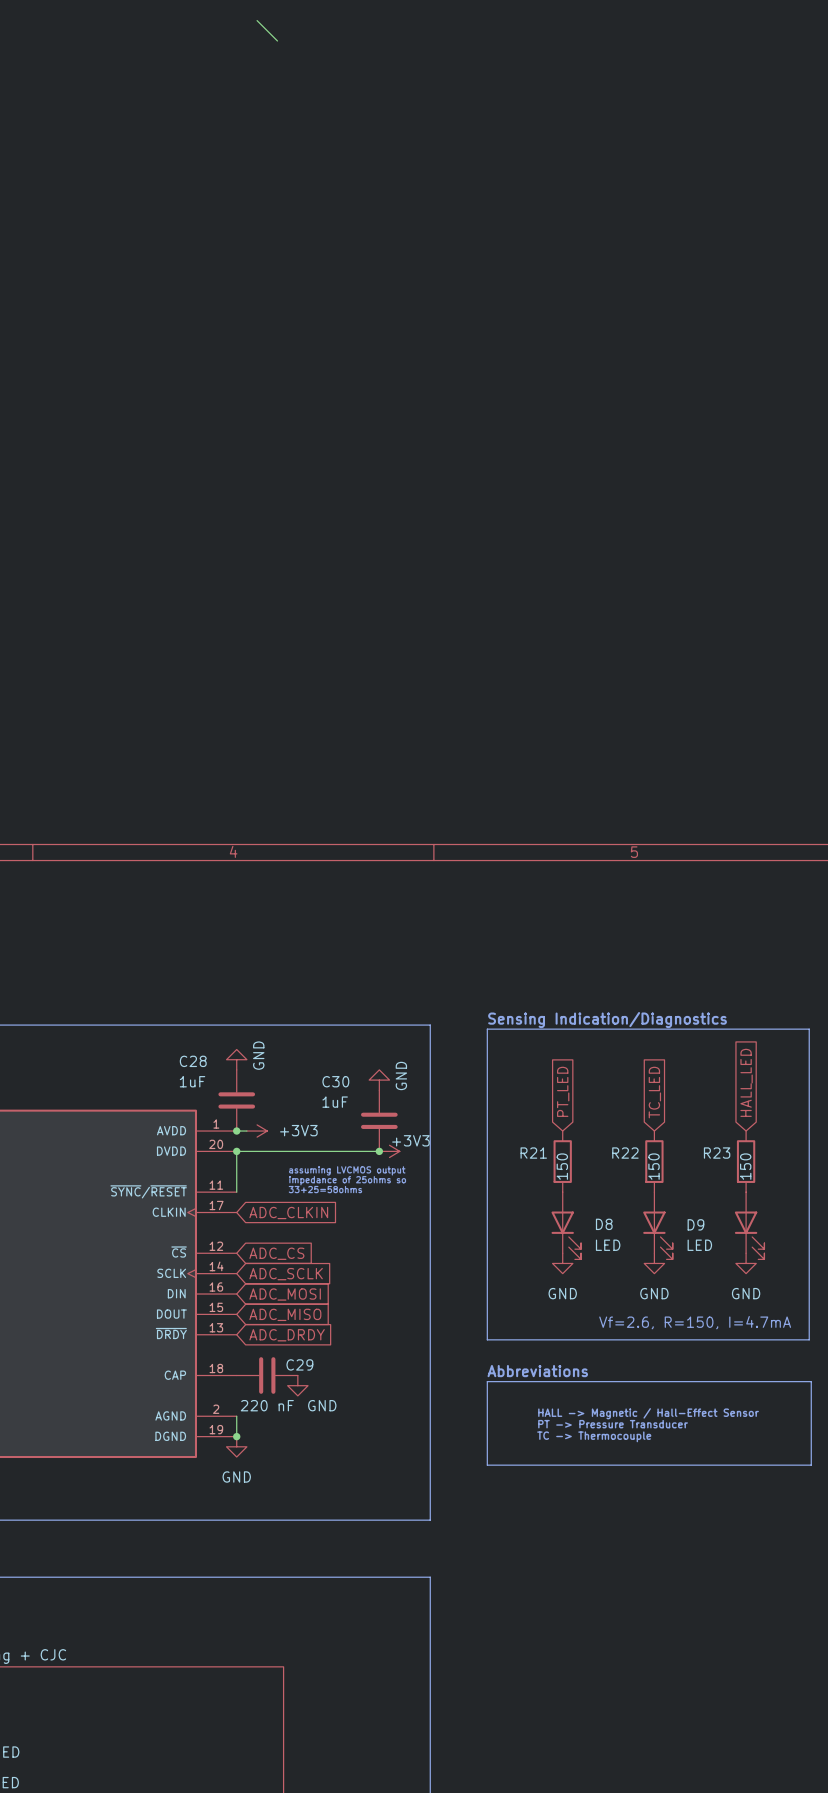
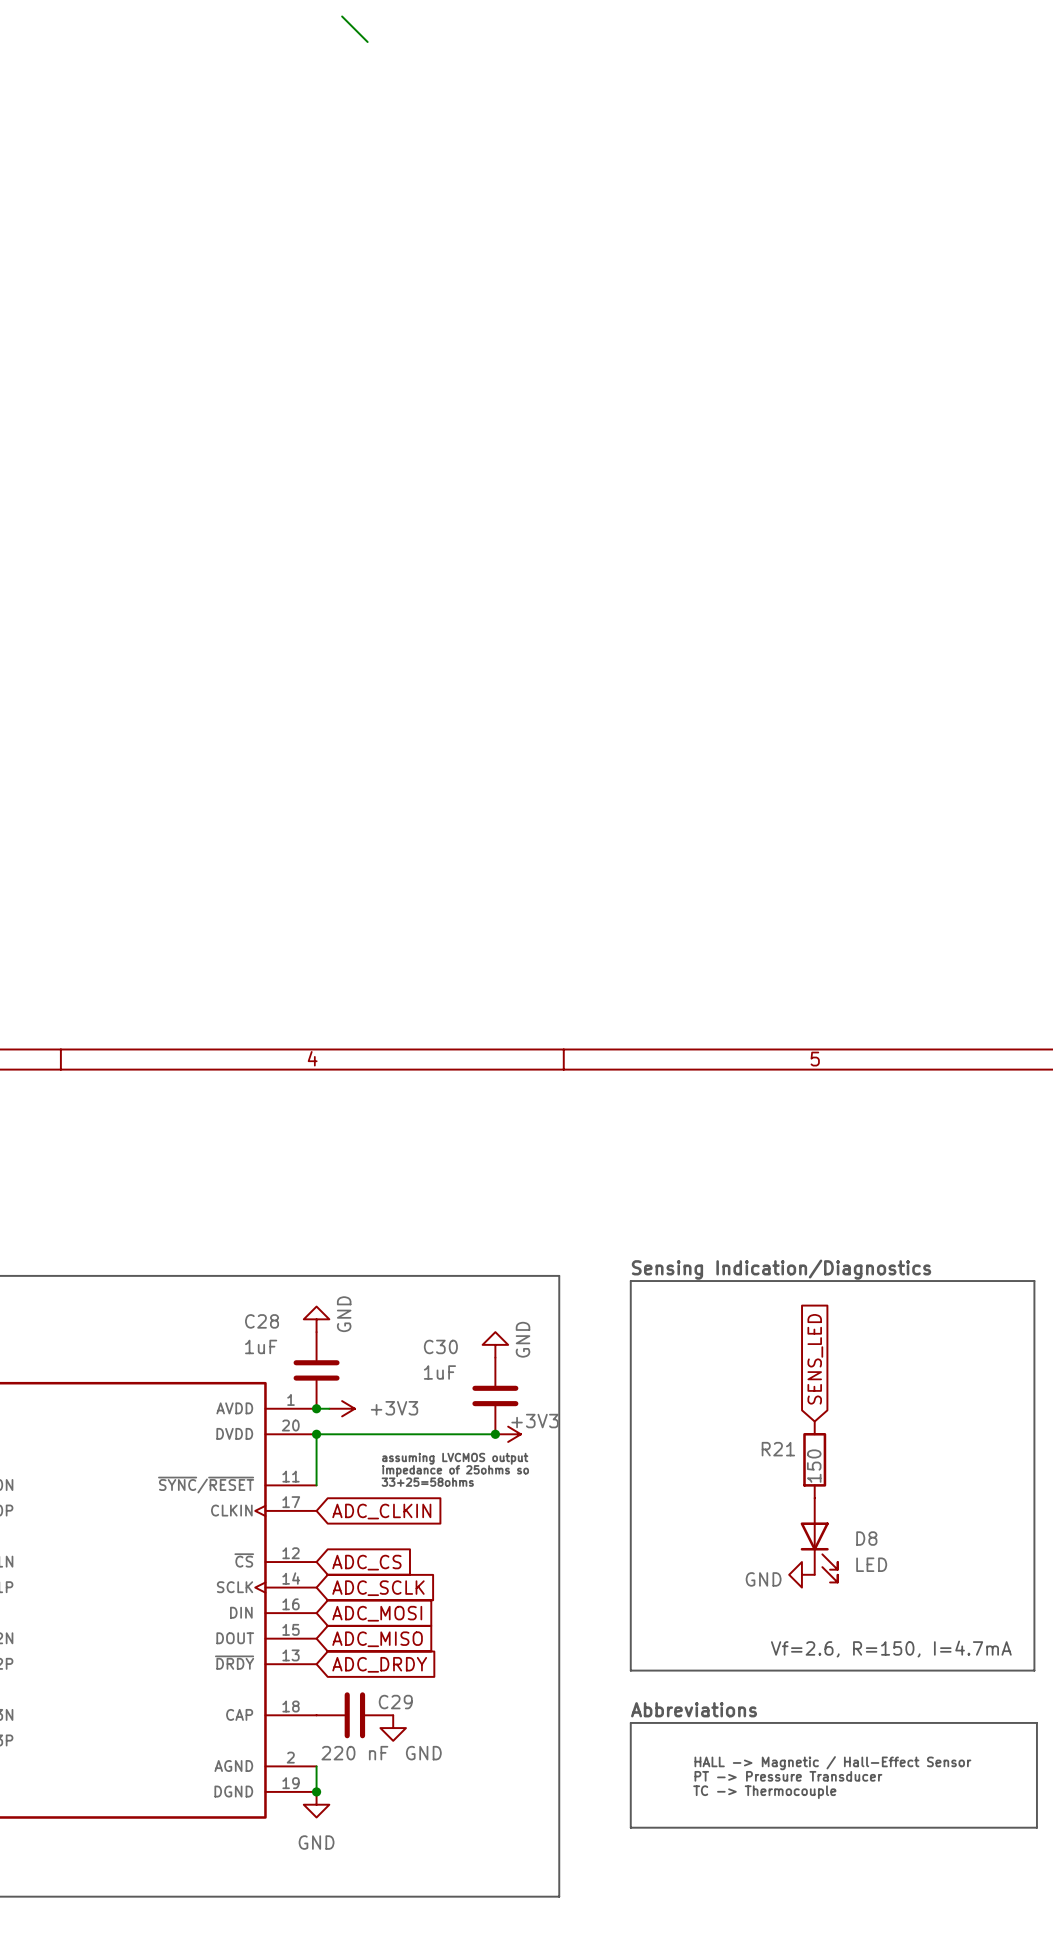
global label: HALL_LED (746, 1082) -> none
global label: PT_LED (563, 1091) -> none
global label: none -> SENS_LED (815, 1359)
global label: TC_LED (654, 1092) -> none
R21 position: (562, 1161) -> (814, 1459)
R22: 150 (654, 1161) -> none
R23: 150 (746, 1161) -> none
D8 position: (566, 1225) -> (819, 1540)
D9: LED (657, 1225) -> none
part: (749, 1225) -> none
power symbol: GND (562, 1263) -> none
power symbol: none -> GND (801, 1574)
power symbol: GND (654, 1263) -> none
power symbol: GND (746, 1263) -> none

